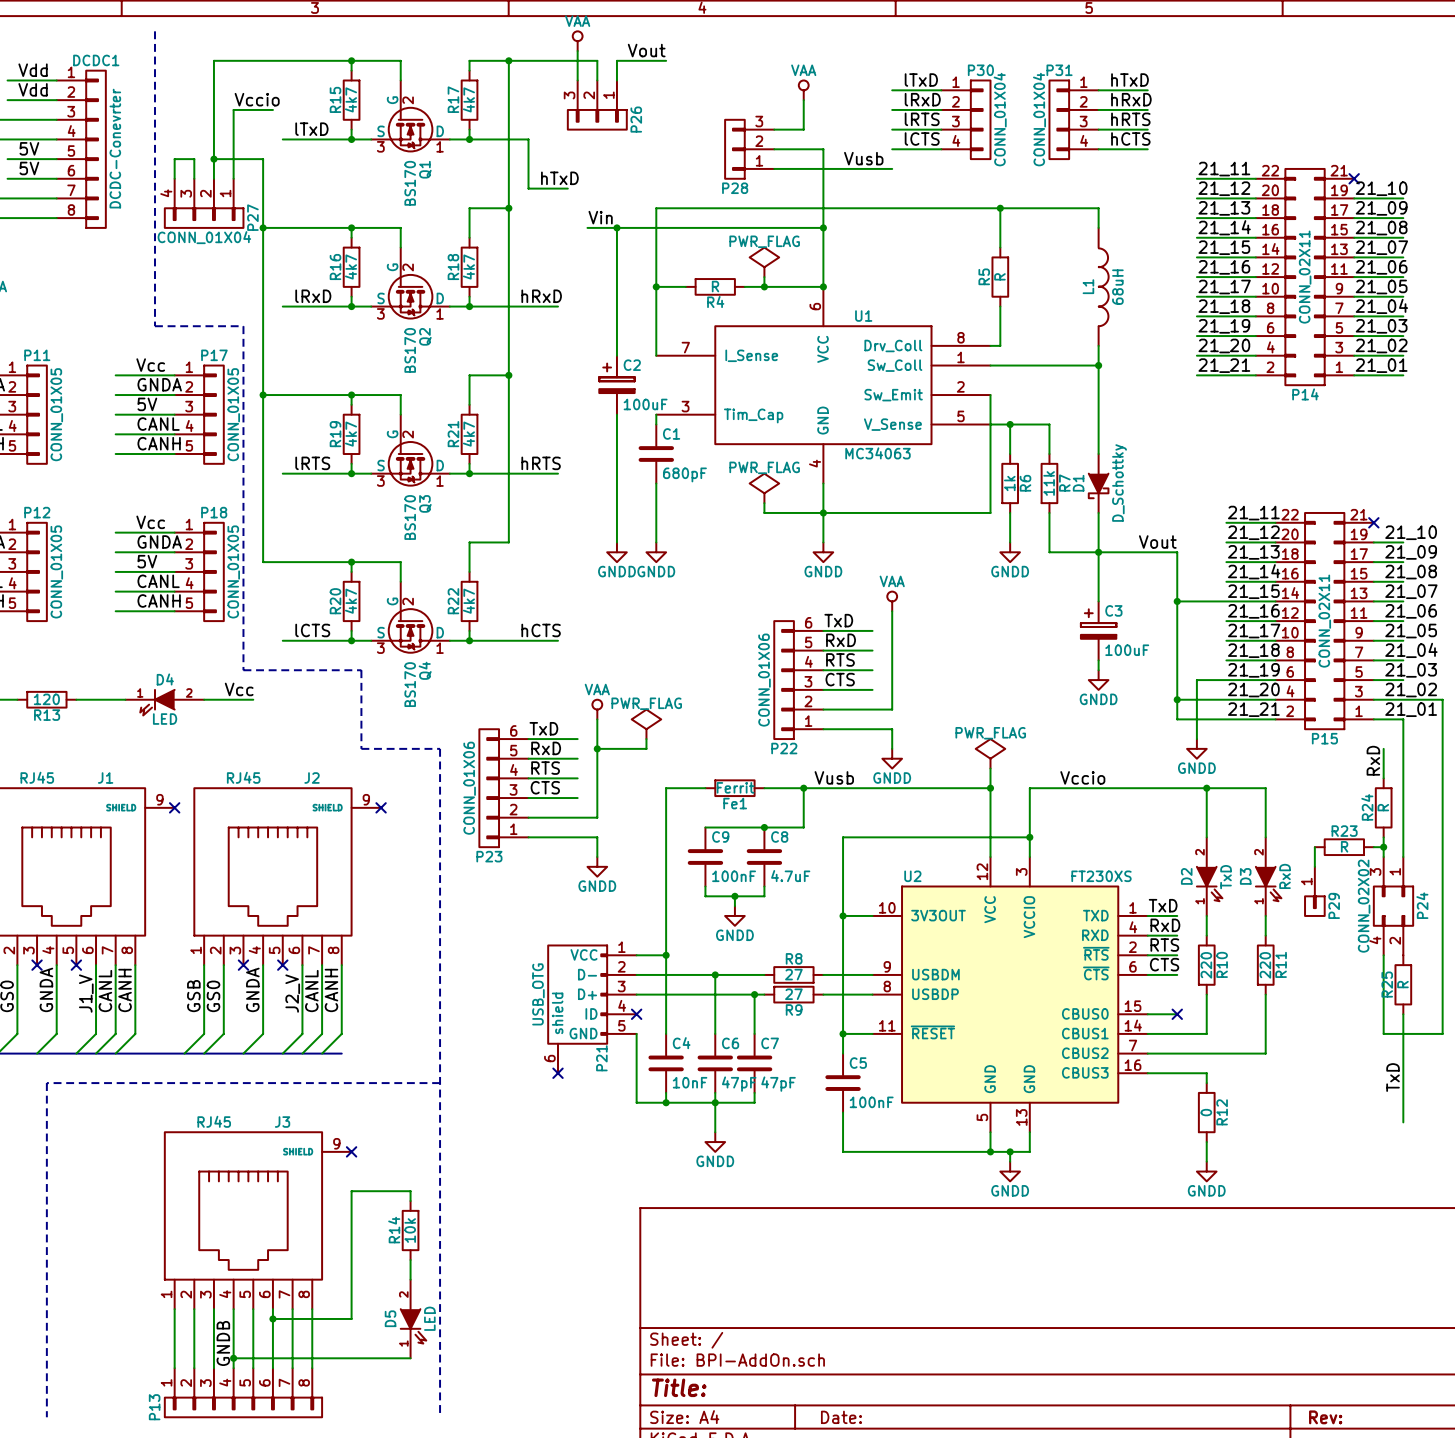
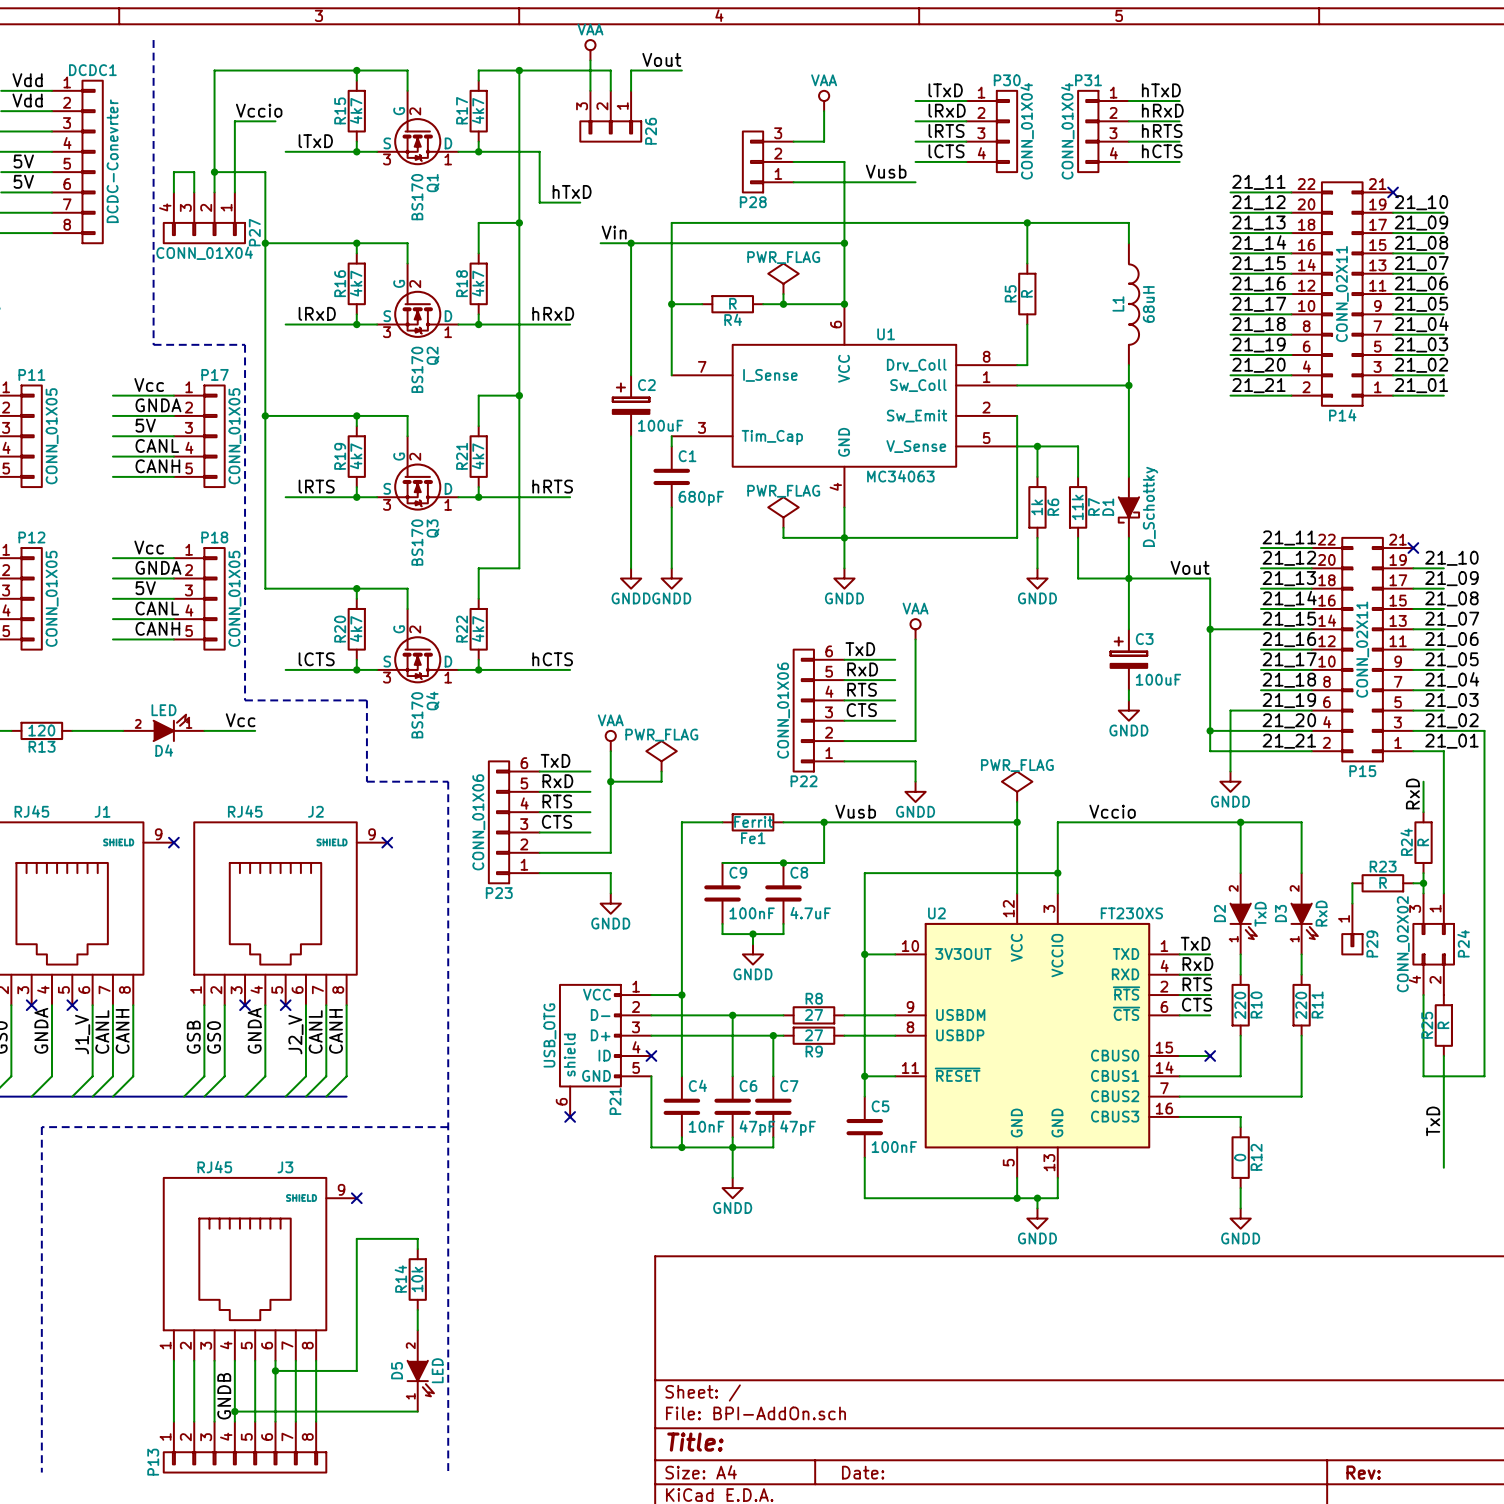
D4 rotation: 0° (157, 702) -> 180° (171, 727)

